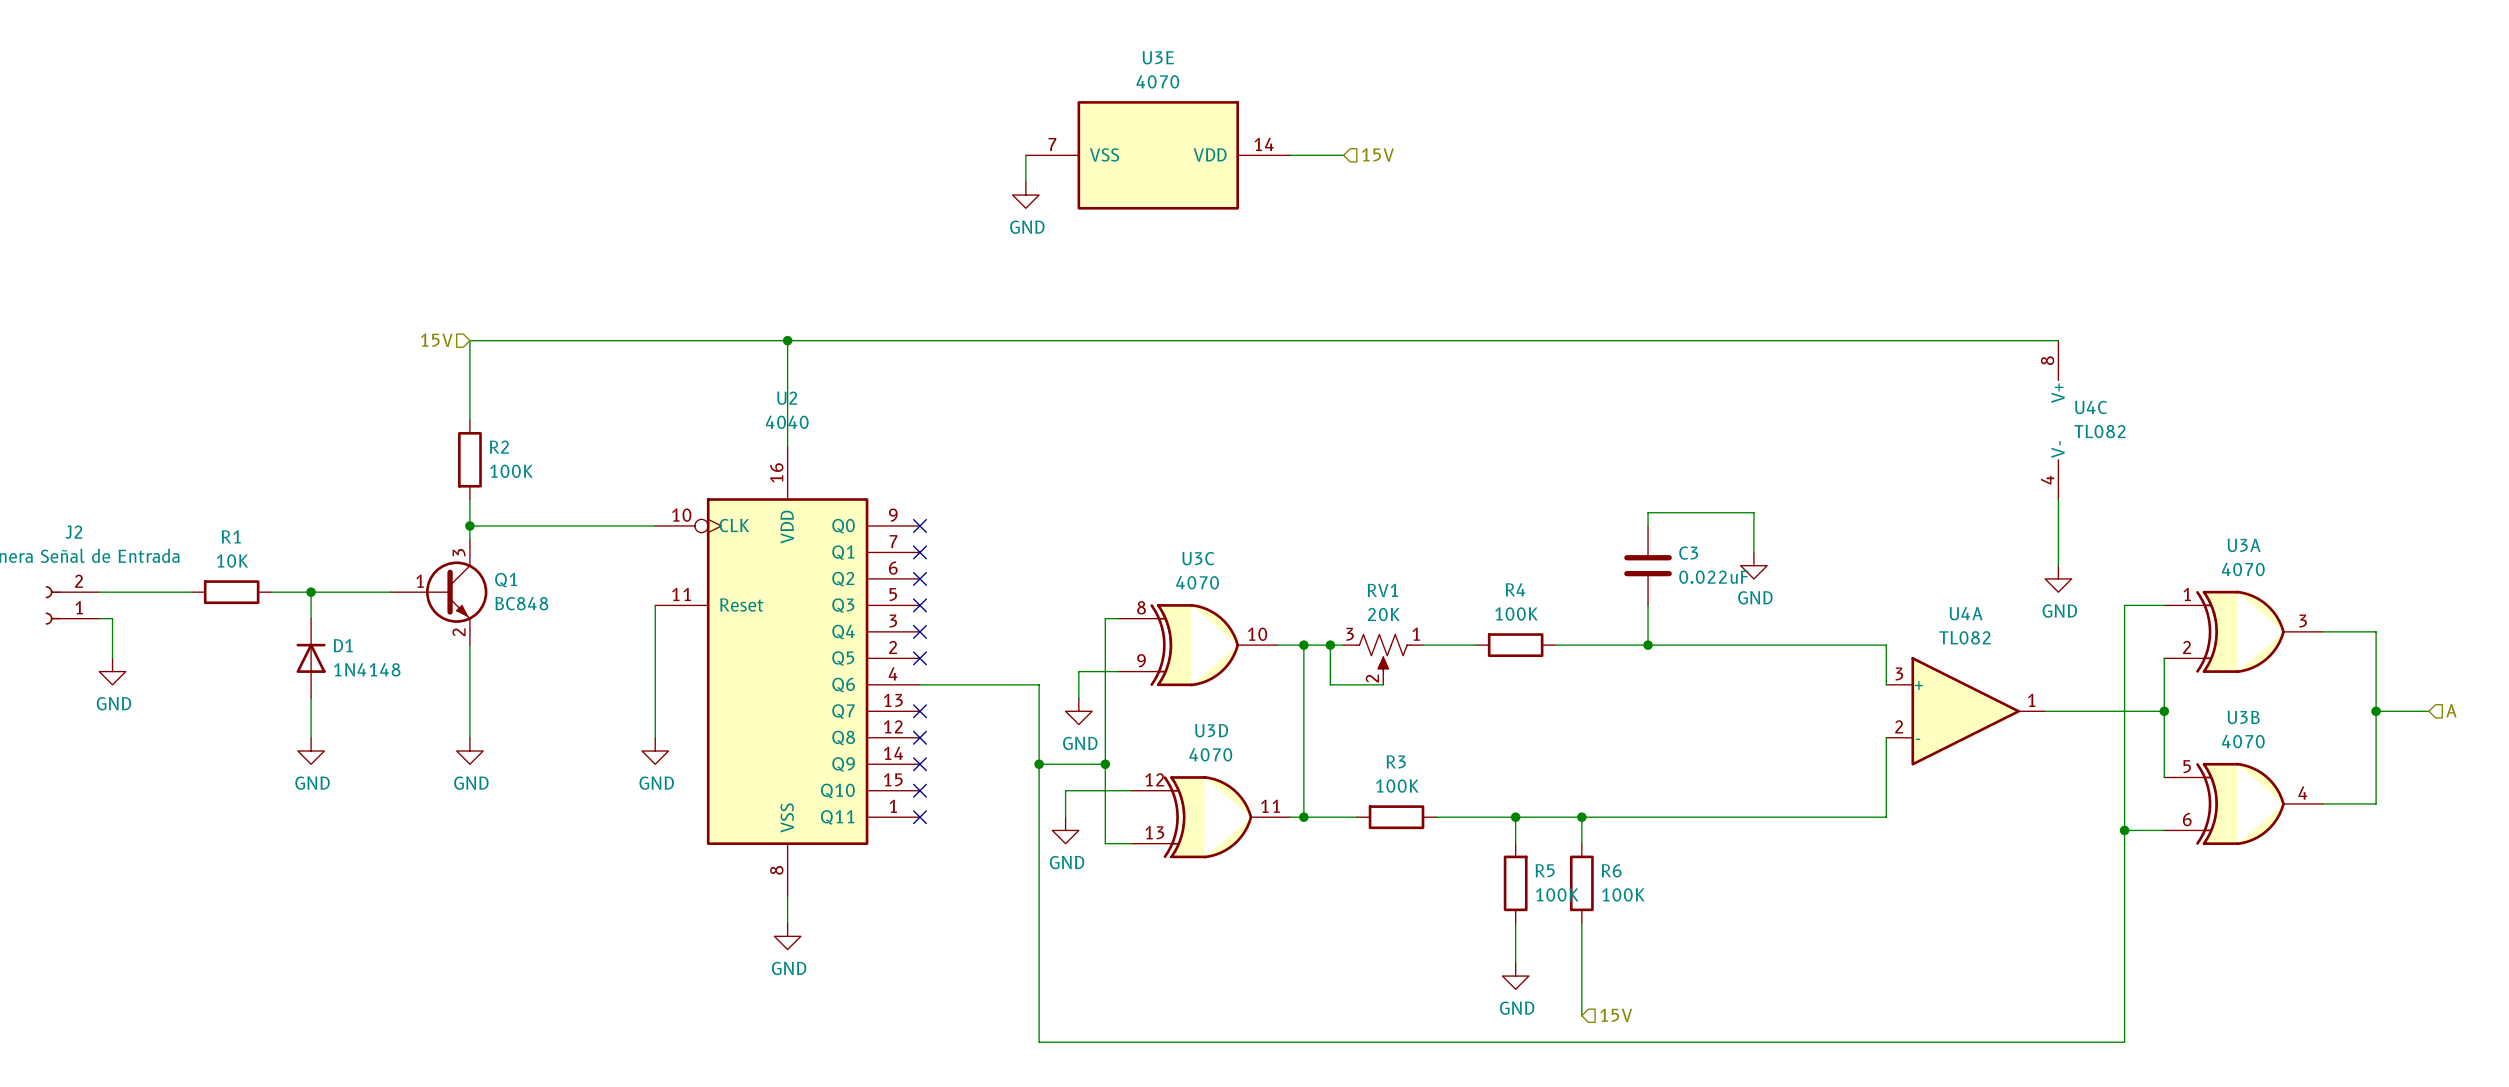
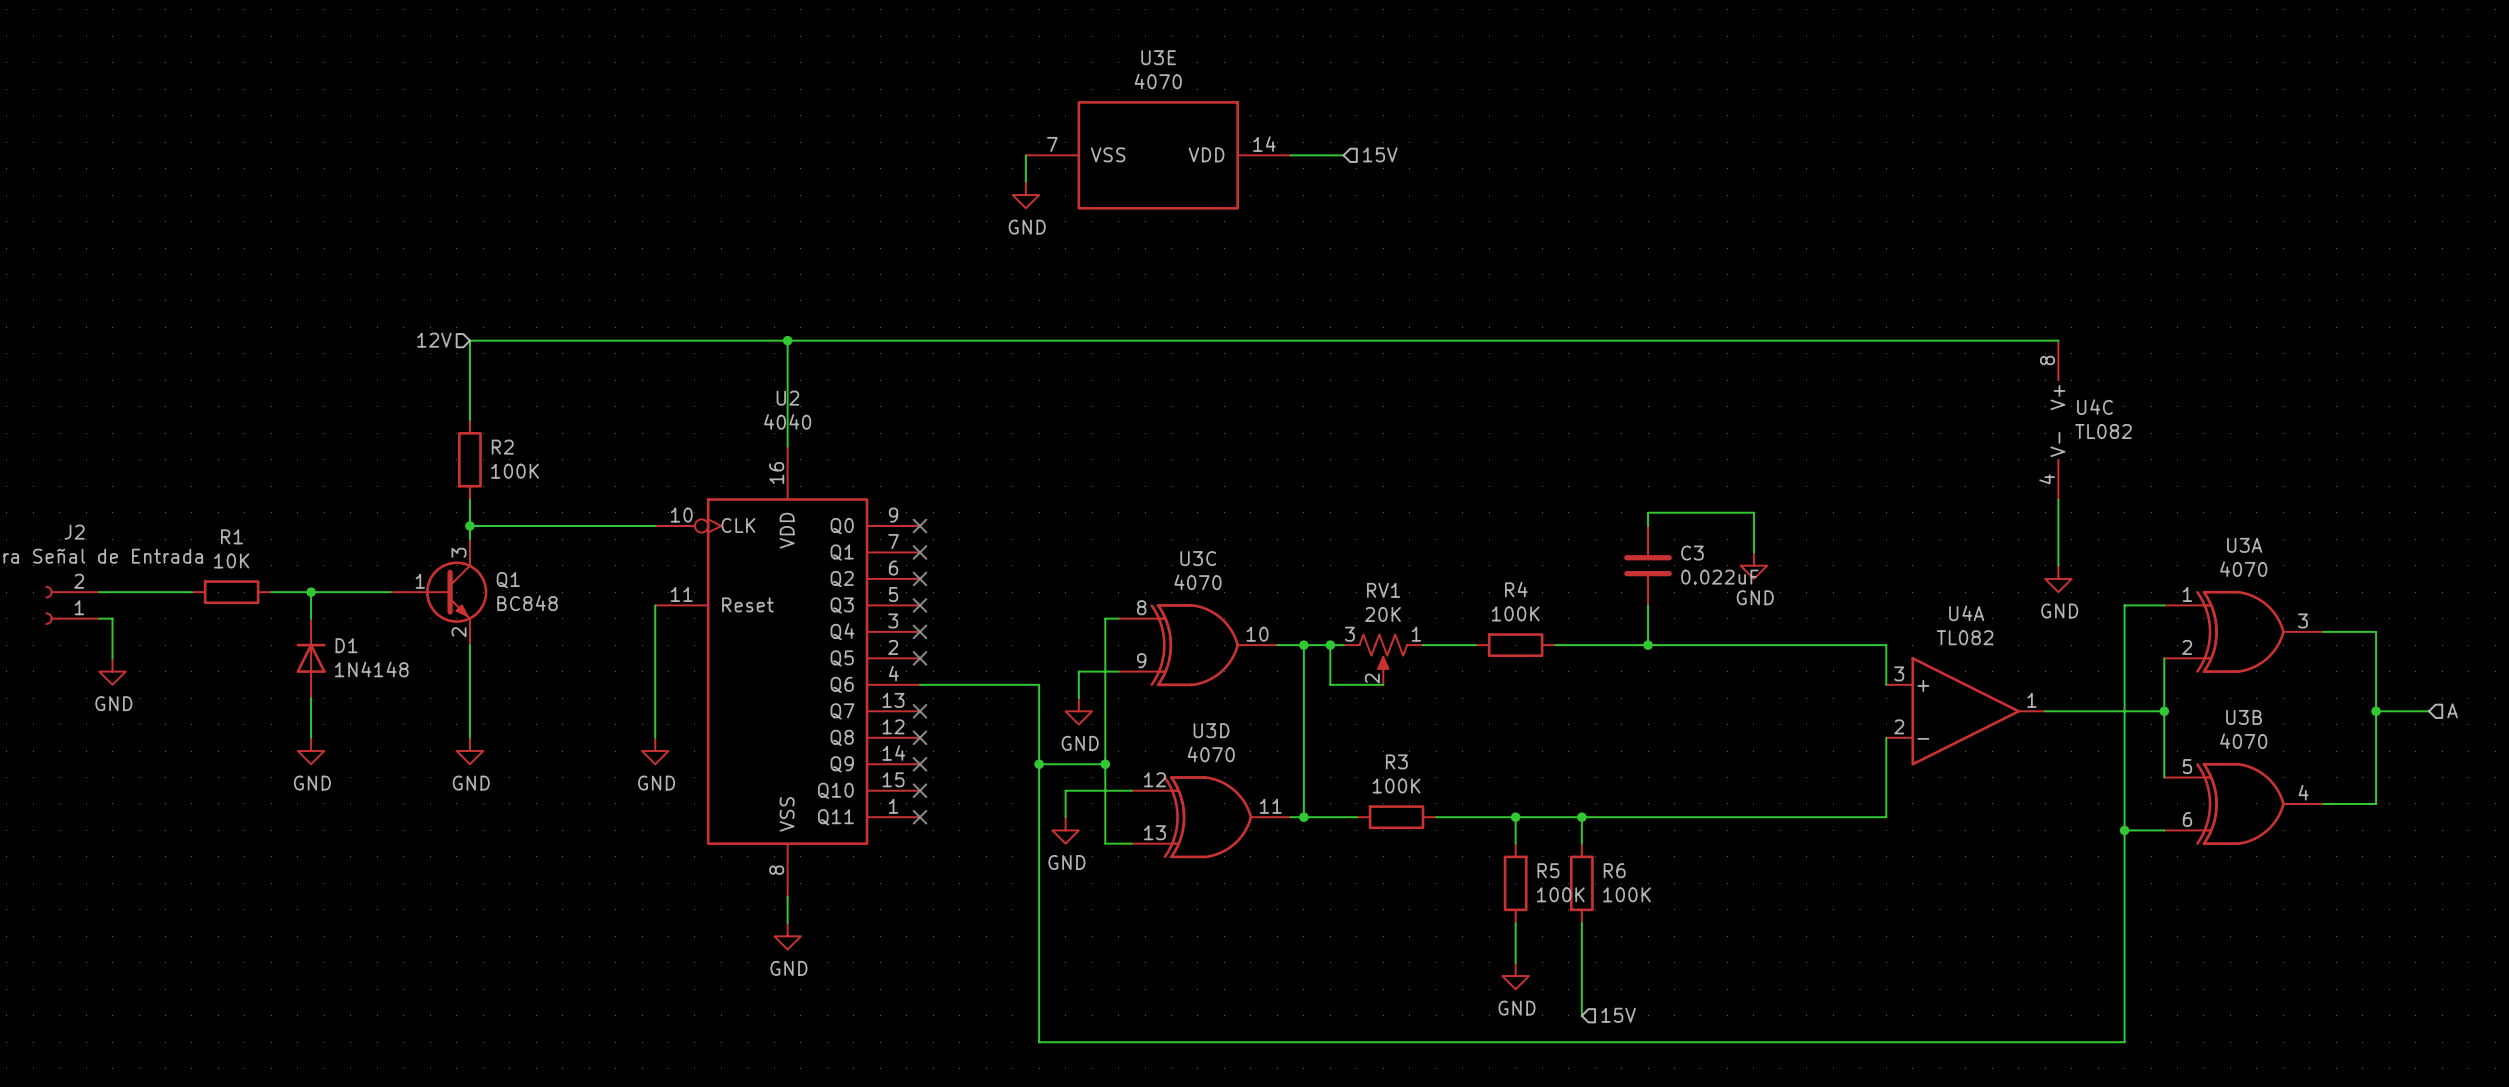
hierarchical label: 15V (436, 340) -> 12V (434, 340)

